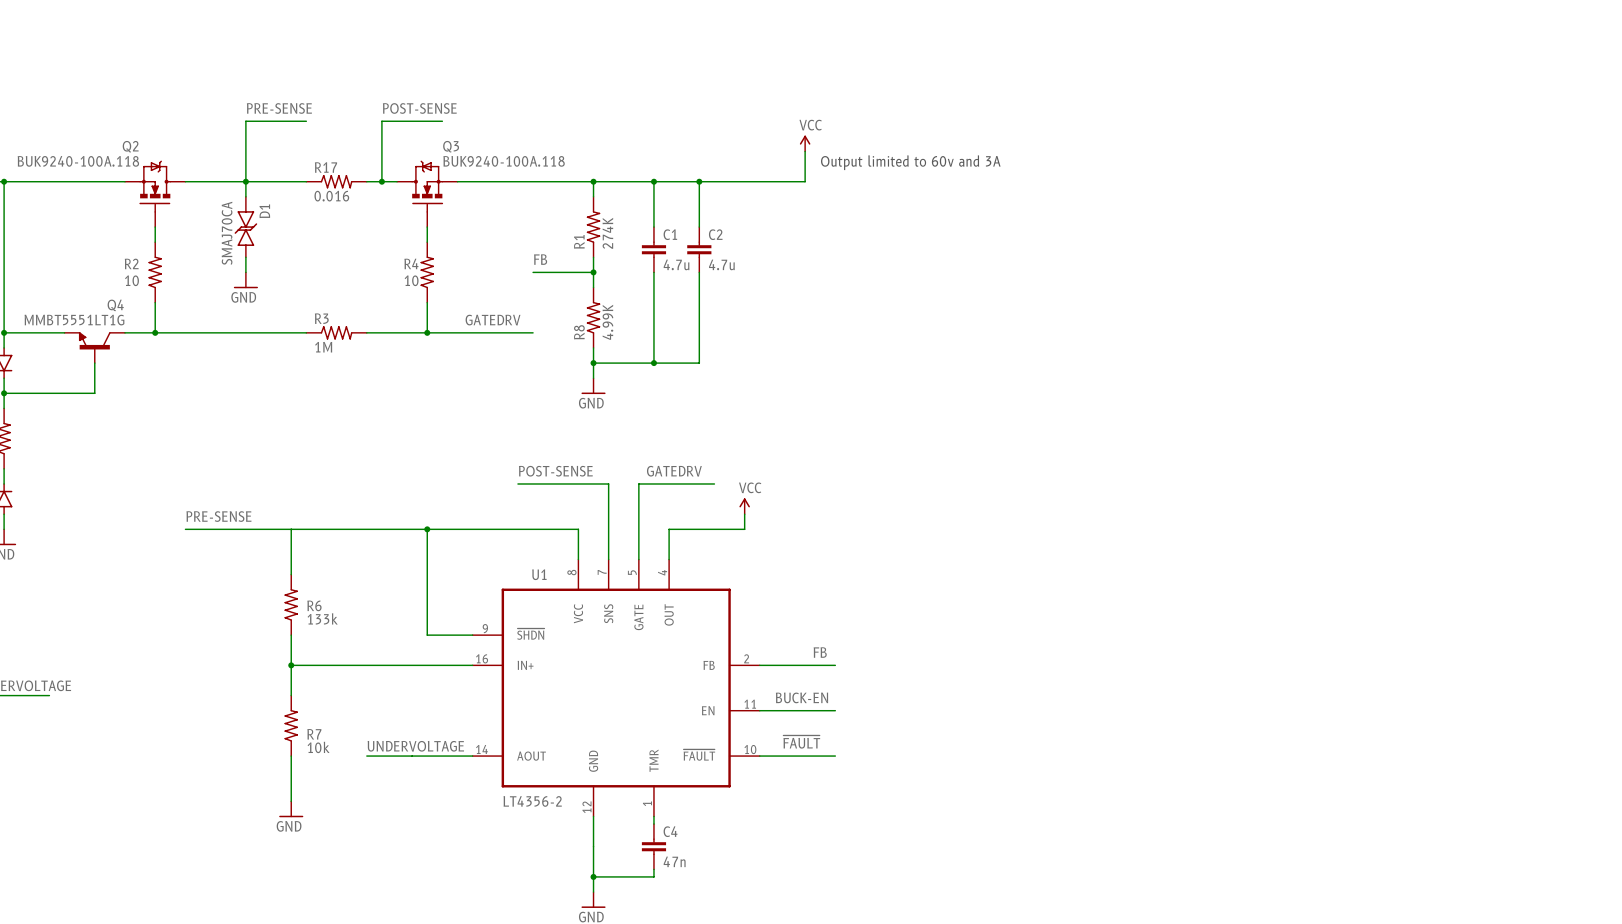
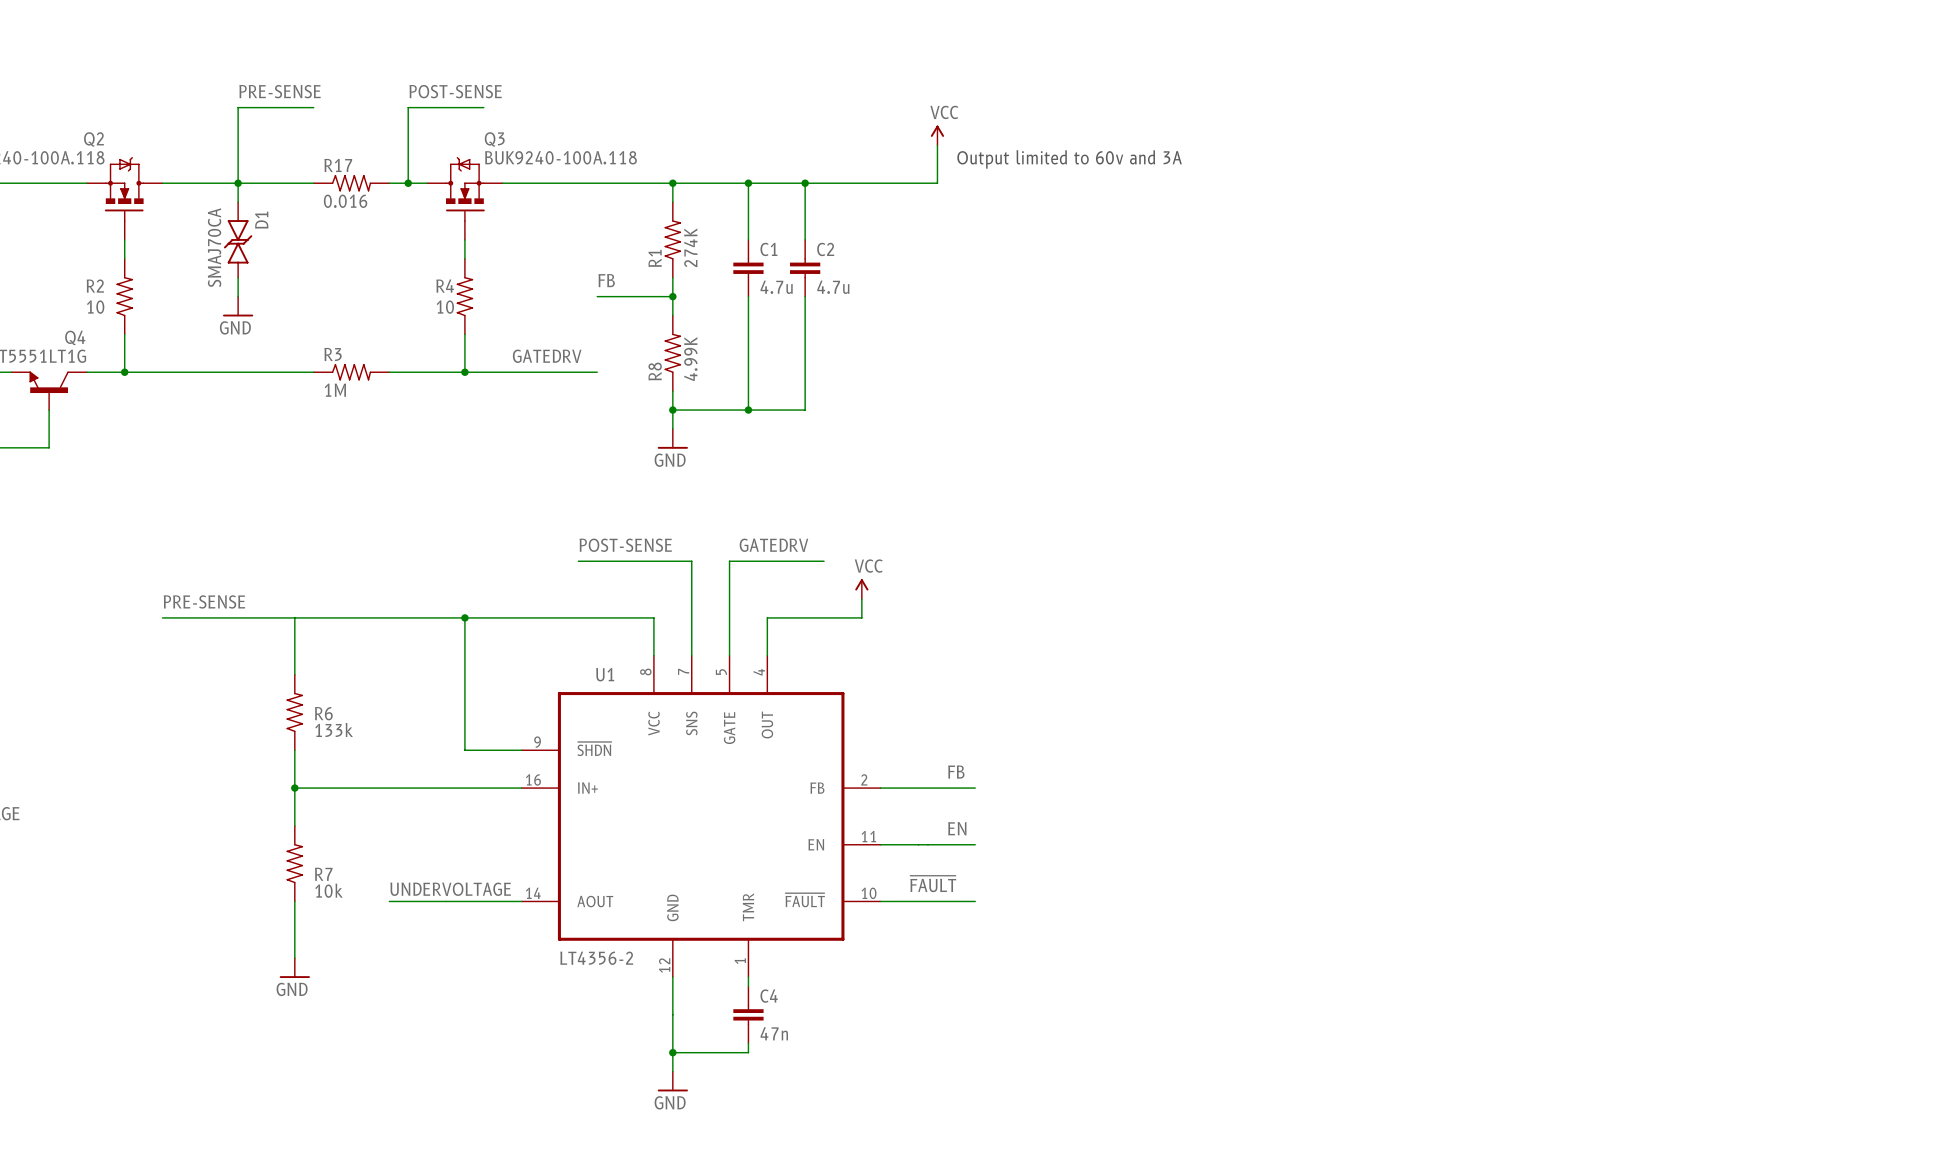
label: BUCK-EN (802, 697) -> none

